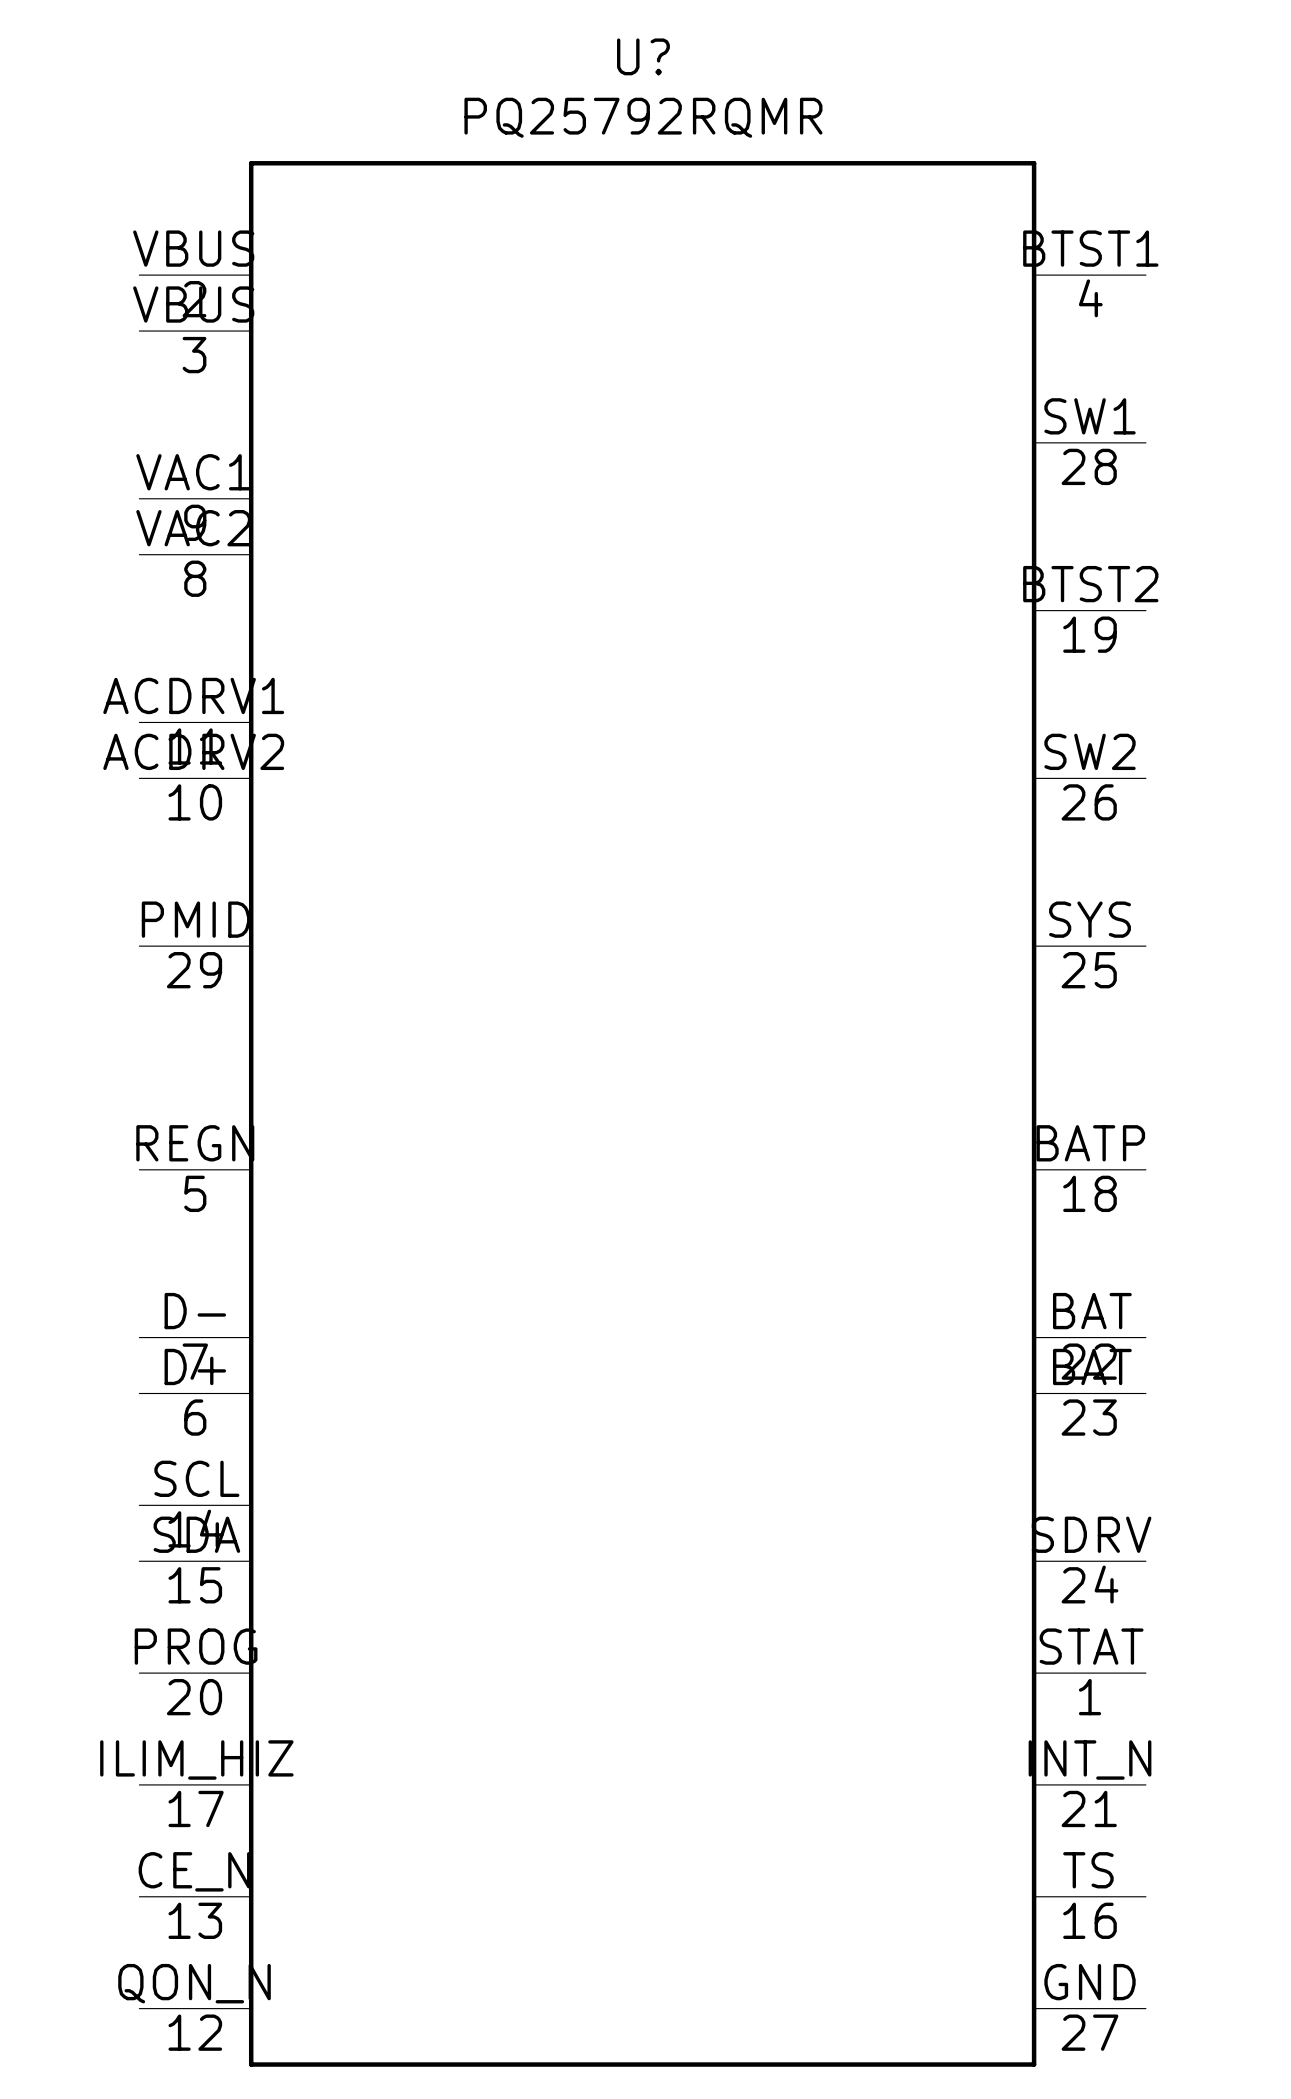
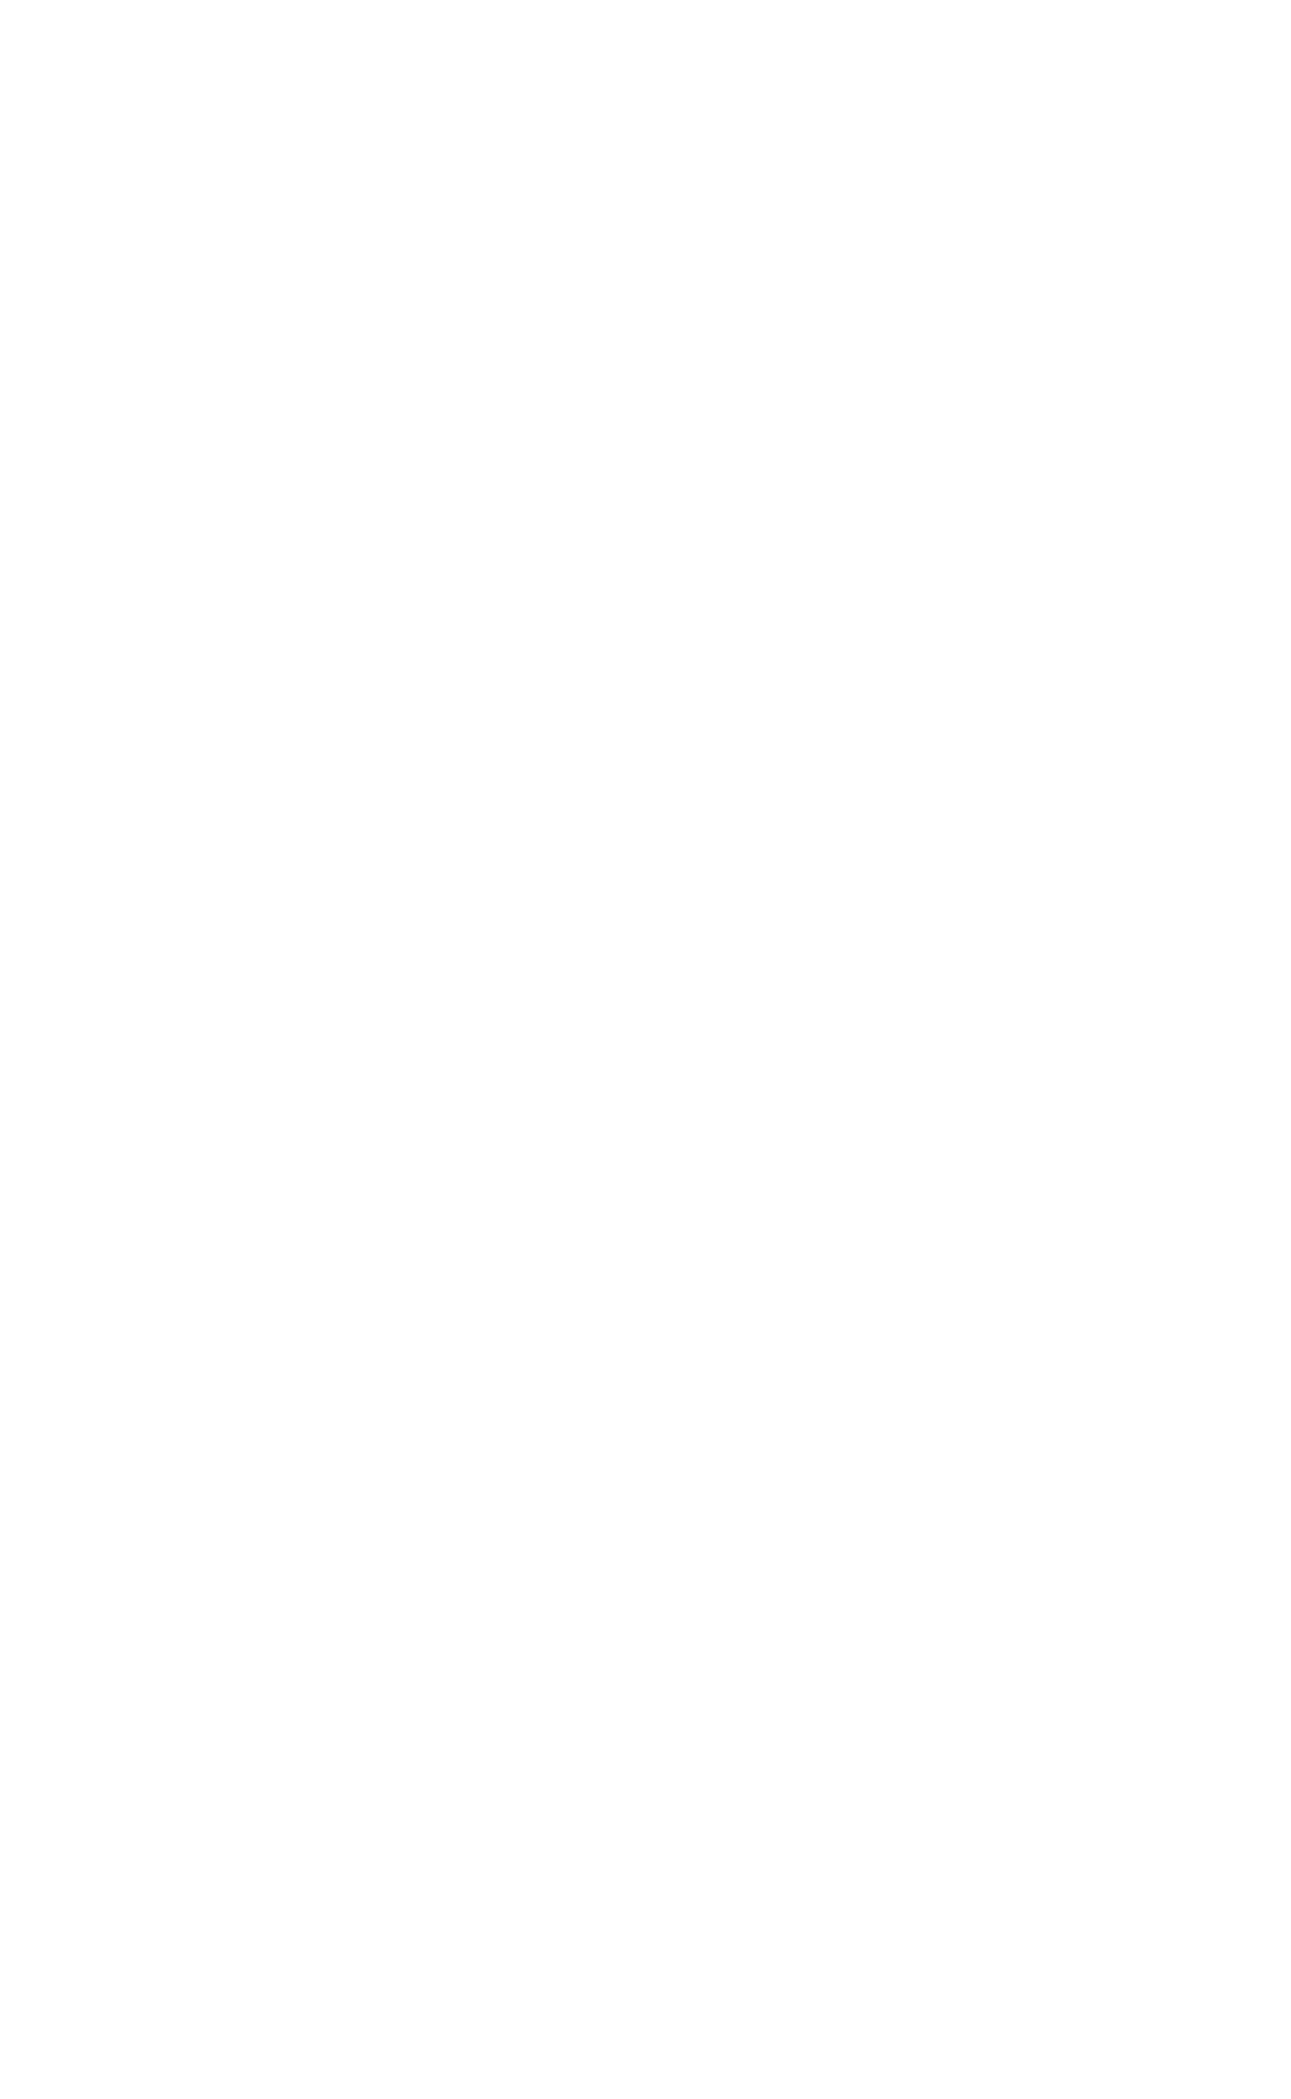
U?: PQ25792RQMR (642, 1113) -> none

